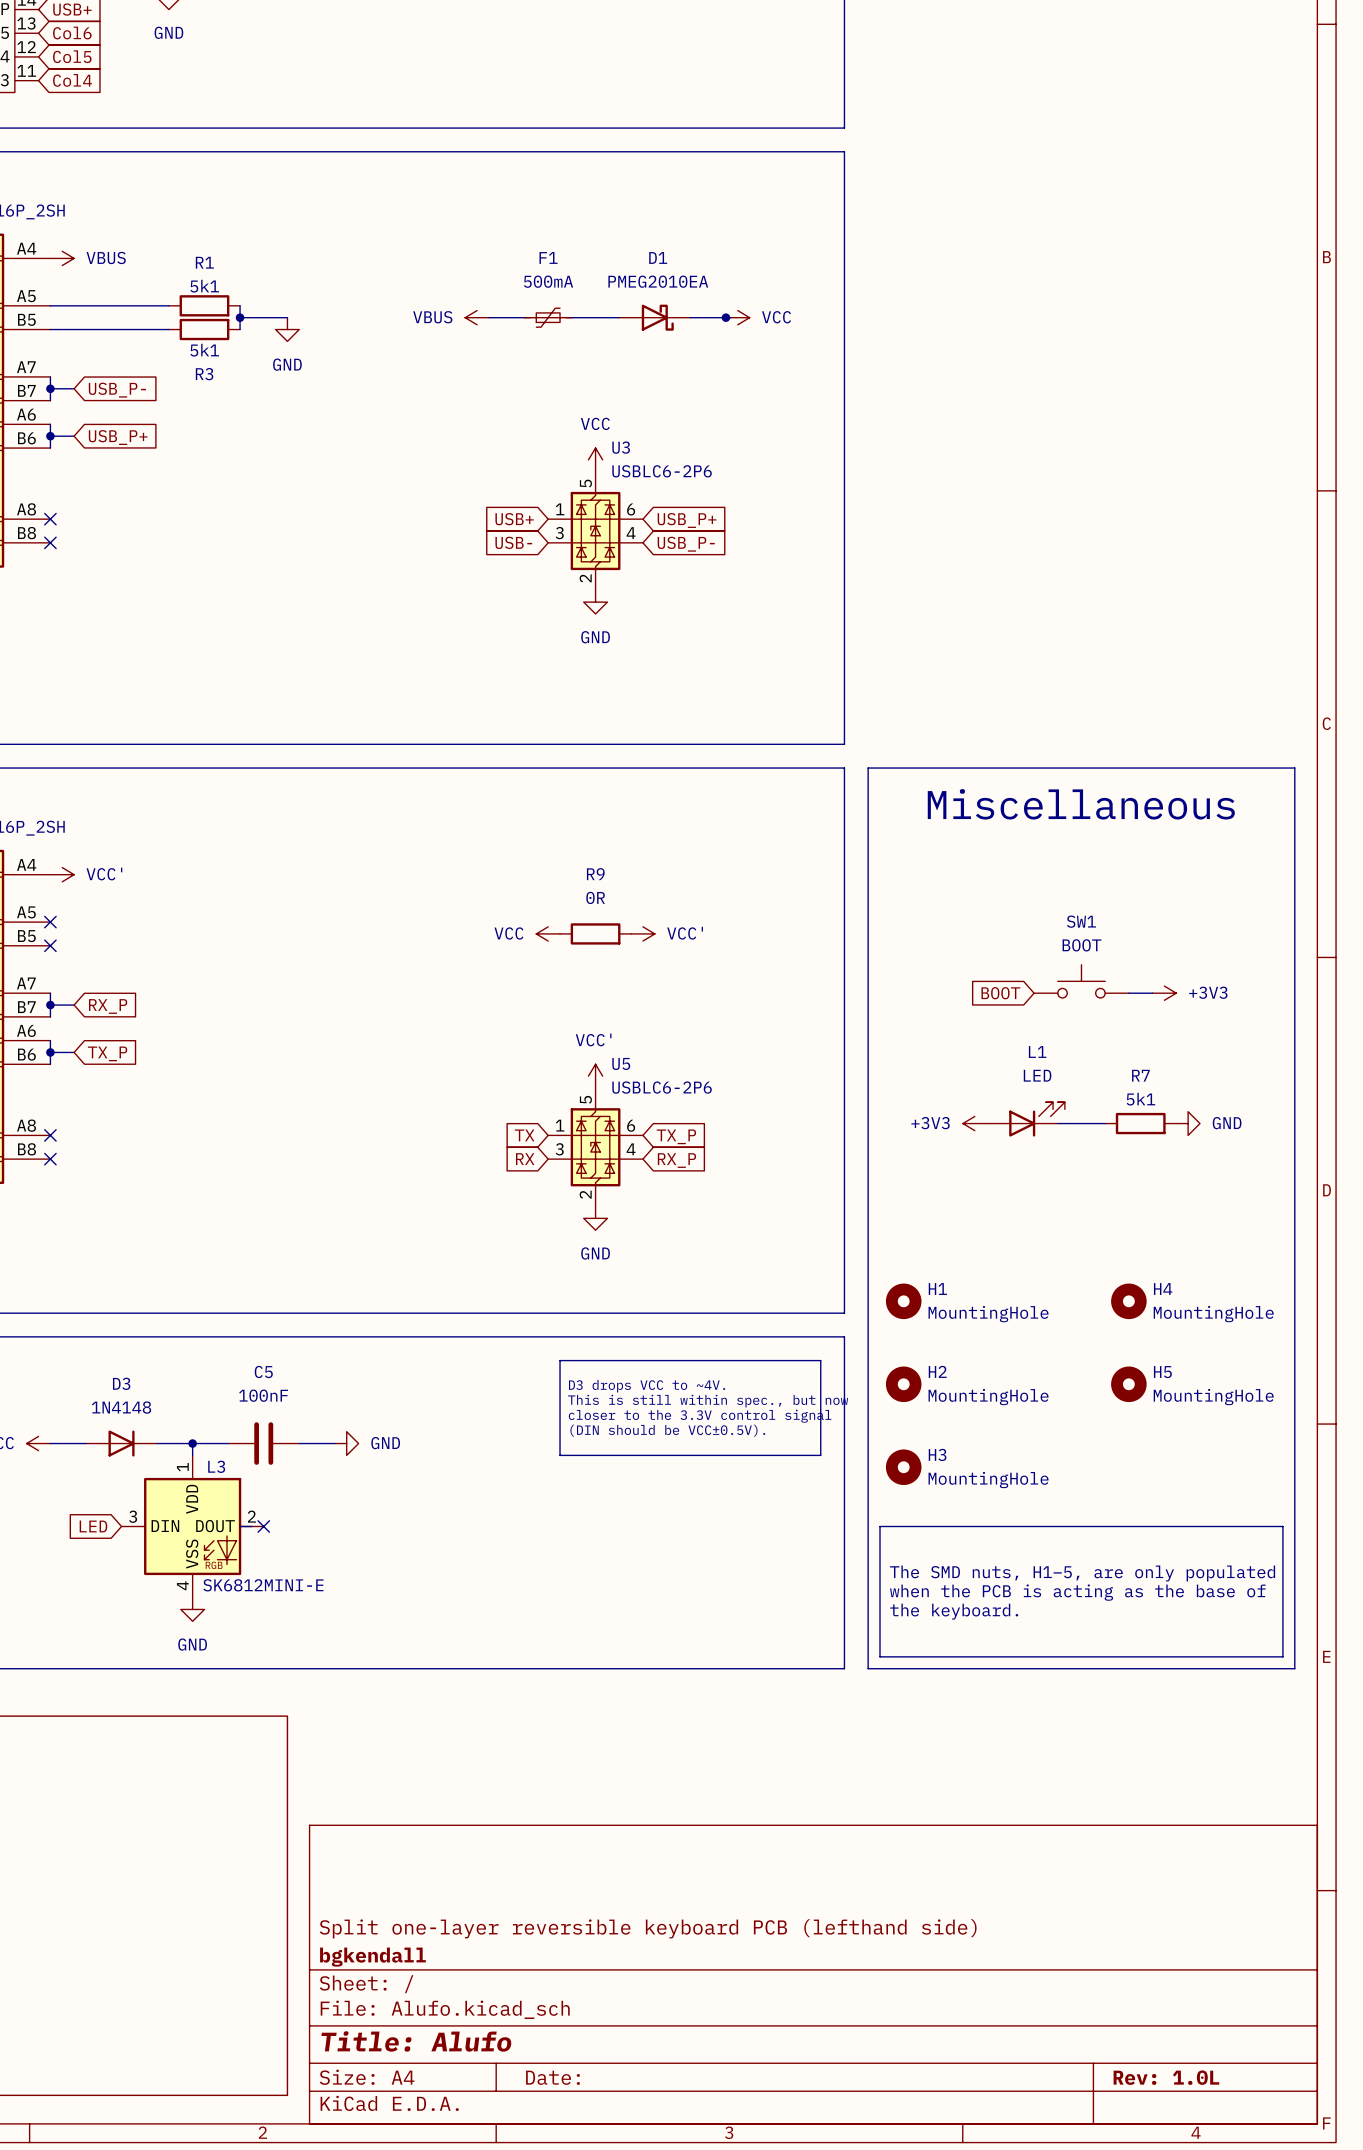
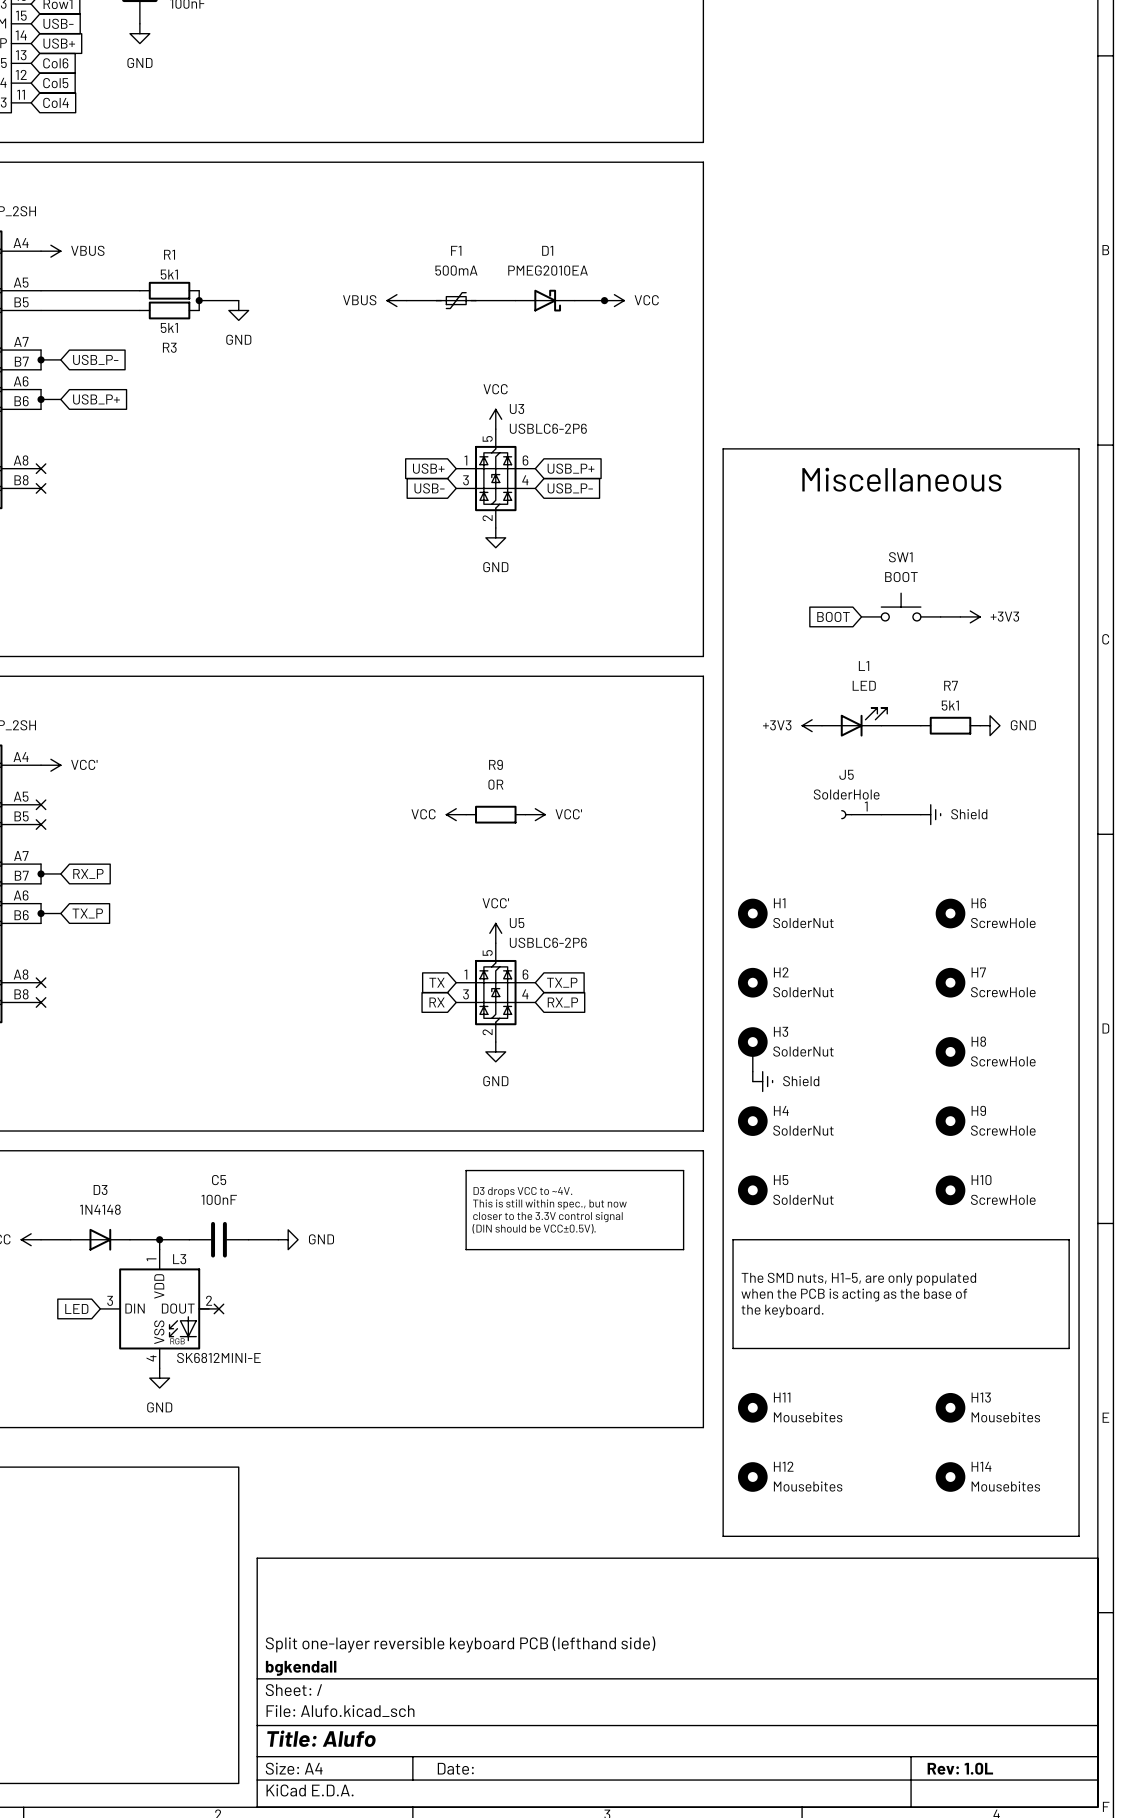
text: none -> Miscellaneous (901, 479)
global label: none -> BOOT (833, 616)
wire: none -> (940, 616) (960, 616)
power symbol: none -> +3V3 (970, 616)
line: (868, 768) (1294, 768) -> (723, 676) (723, 448) (1079, 448) (1079, 676)
text: Miscellaneous (1081, 804) -> none
power symbol: none -> +3V3 (812, 725)
wire: none -> (881, 725) (920, 725)
power symbol: none -> GND (990, 725)
J5: none -> SolderHole (861, 814)
power symbol: none -> Shield (930, 814)
SW1 position: (1081, 981) -> (901, 607)
global label: BOOT (1000, 993) -> none
wire: (1128, 993) (1152, 993) -> none
power symbol: +3V3 (1164, 993) -> none
H1: none -> SolderNut (752, 913)
H6: none -> ScrewHole (950, 913)
L1 position: (1025, 1119) -> (854, 722)
power symbol: +3V3 (974, 1123) -> none
wire: (1057, 1123) (1105, 1123) -> (881, 814) (920, 814)
R7 position: (1140, 1123) -> (950, 725)
power symbol: GND (1188, 1123) -> none
H2: none -> SolderNut (752, 982)
H7: none -> ScrewHole (950, 982)
H8: none -> ScrewHole (950, 1051)
wire: none -> (752, 1071) (752, 1081)
power symbol: none -> Shield (762, 1081)
H1 name: H1 (937, 1289) -> H4 (781, 1110)
H4: MountingHole (1128, 1301) -> none
H9: none -> ScrewHole (950, 1121)
H1 value: MountingHole (988, 1314) -> SolderNut (803, 1130)
H2 name: H2 (937, 1371) -> H5 (781, 1180)
H5: MountingHole (1128, 1384) -> none
H10: none -> ScrewHole (950, 1190)
H2 value: MountingHole (988, 1397) -> SolderNut (803, 1199)
H3 symbol: [885, 1449, 922, 1486] -> [737, 1027, 768, 1072]
H3 value: MountingHole (988, 1480) -> SolderNut (803, 1051)
line: (879, 1526) (1282, 1526) -> (733, 1308) (733, 1239) (1069, 1239) (1069, 1308)
line: (879, 1573) (879, 1656) (1282, 1656) (1282, 1573) -> (733, 1348) (1069, 1348)
text position: The SMD nuts, H1–5, are only populated (1082, 1573) -> The SMD nuts, H1–5, are only populated (858, 1279)
text position: when the PCB is acting as the base of (1077, 1592) -> when the PCB is acting as the base of (854, 1295)
text position: the keyboard. (954, 1611) -> the keyboard. (782, 1311)
H11: none -> Mousebites (752, 1407)
H13: none -> Mousebites (950, 1407)
line: (868, 1668) (1294, 1668) -> (723, 1427) (723, 1536) (1079, 1536) (1079, 1427)
H12: none -> Mousebites (752, 1477)
H14: none -> Mousebites (950, 1477)

